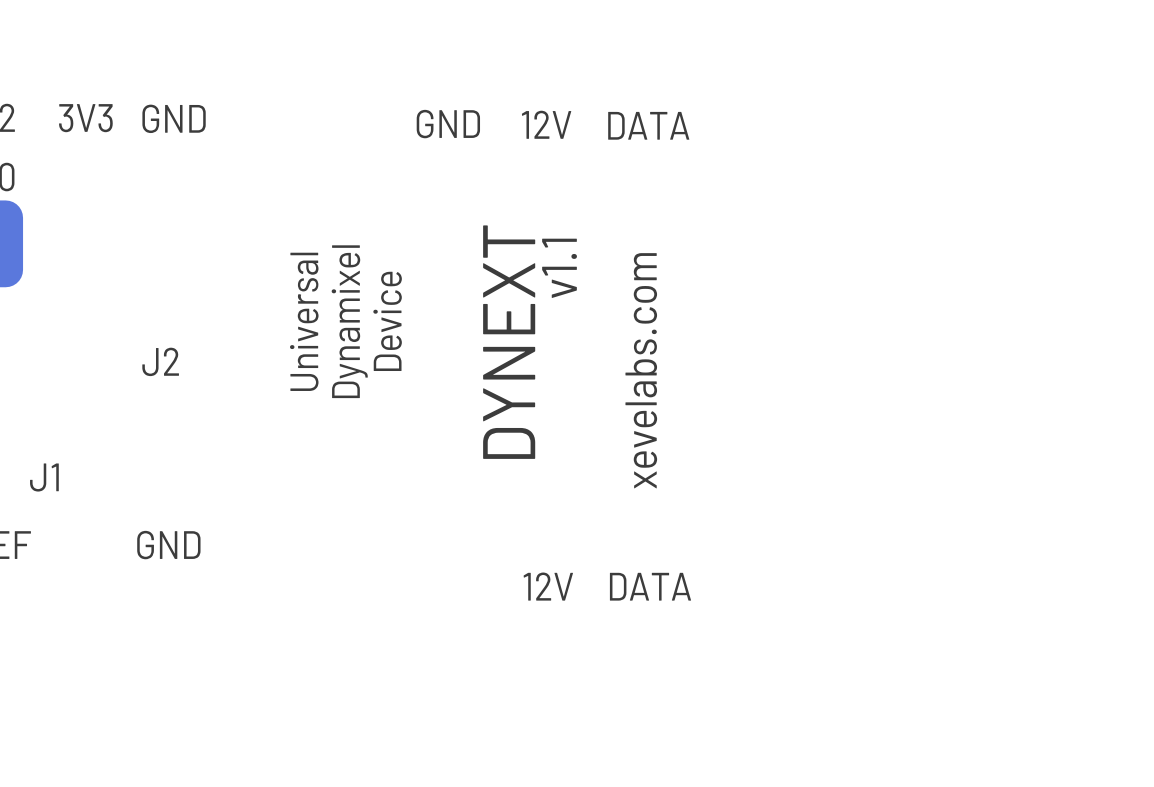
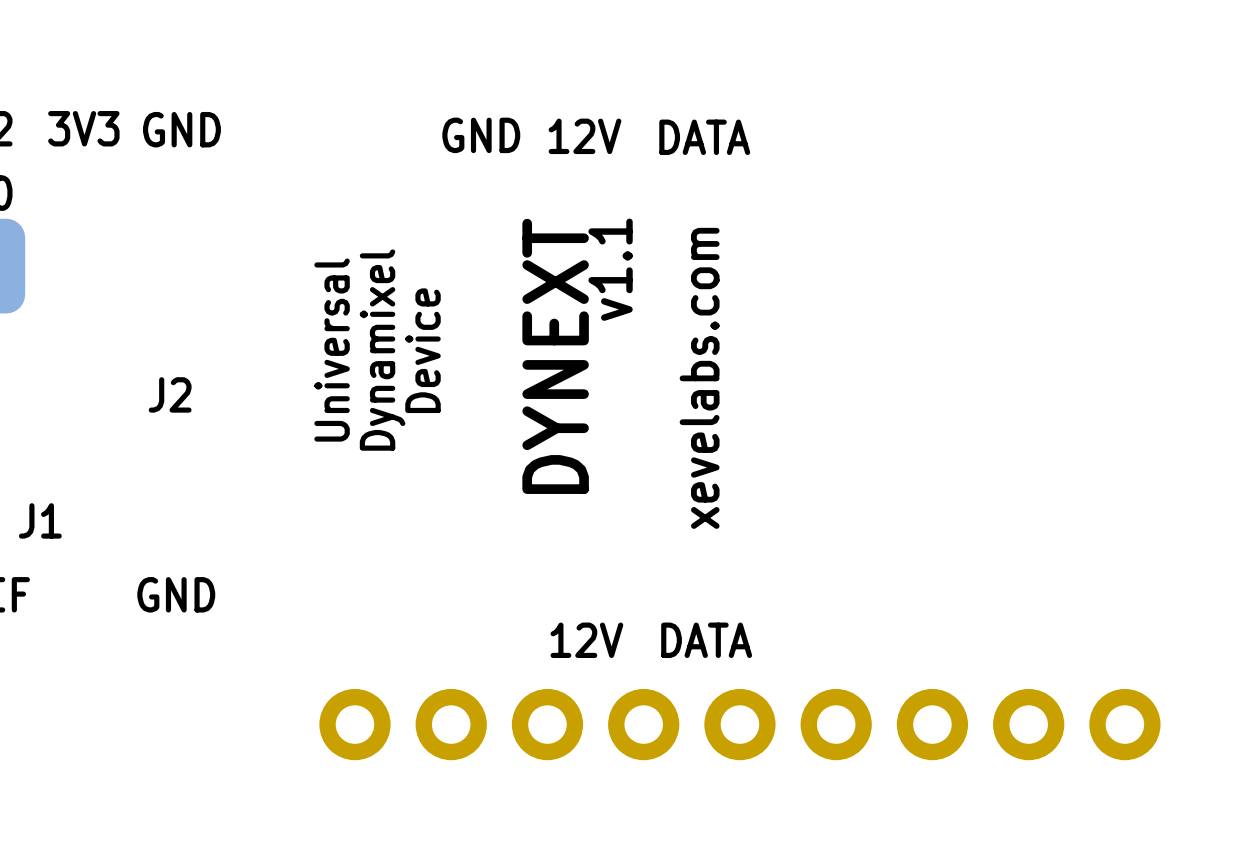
part: none -> (739, 724)

